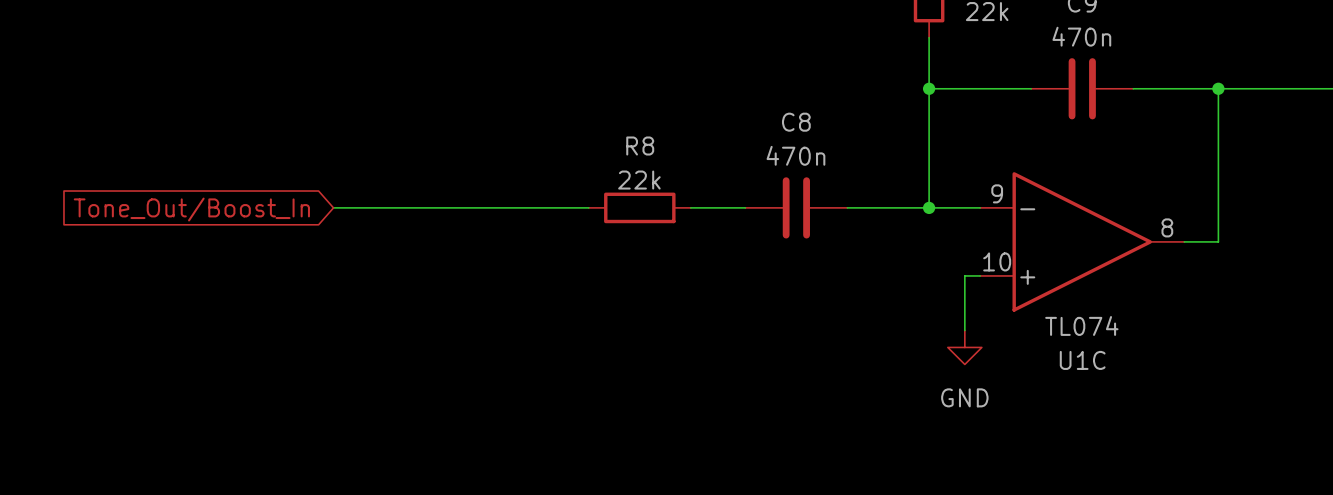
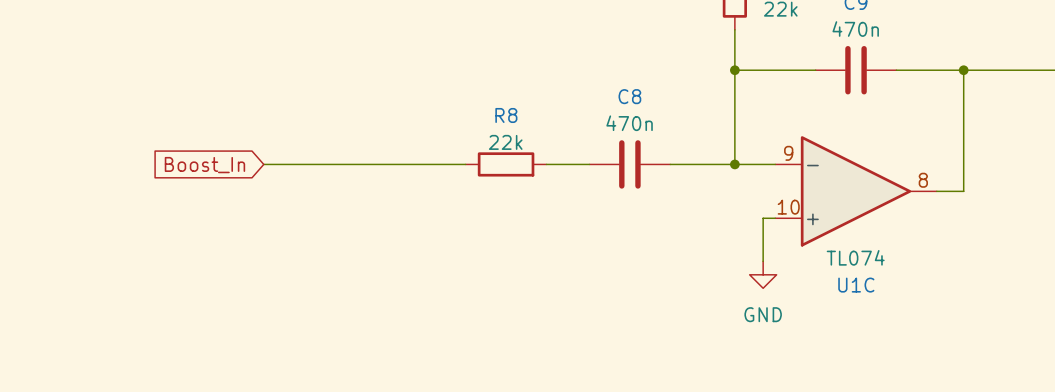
global label: Tone_Out/Boost_In (191, 209) -> Boost_In (204, 165)

